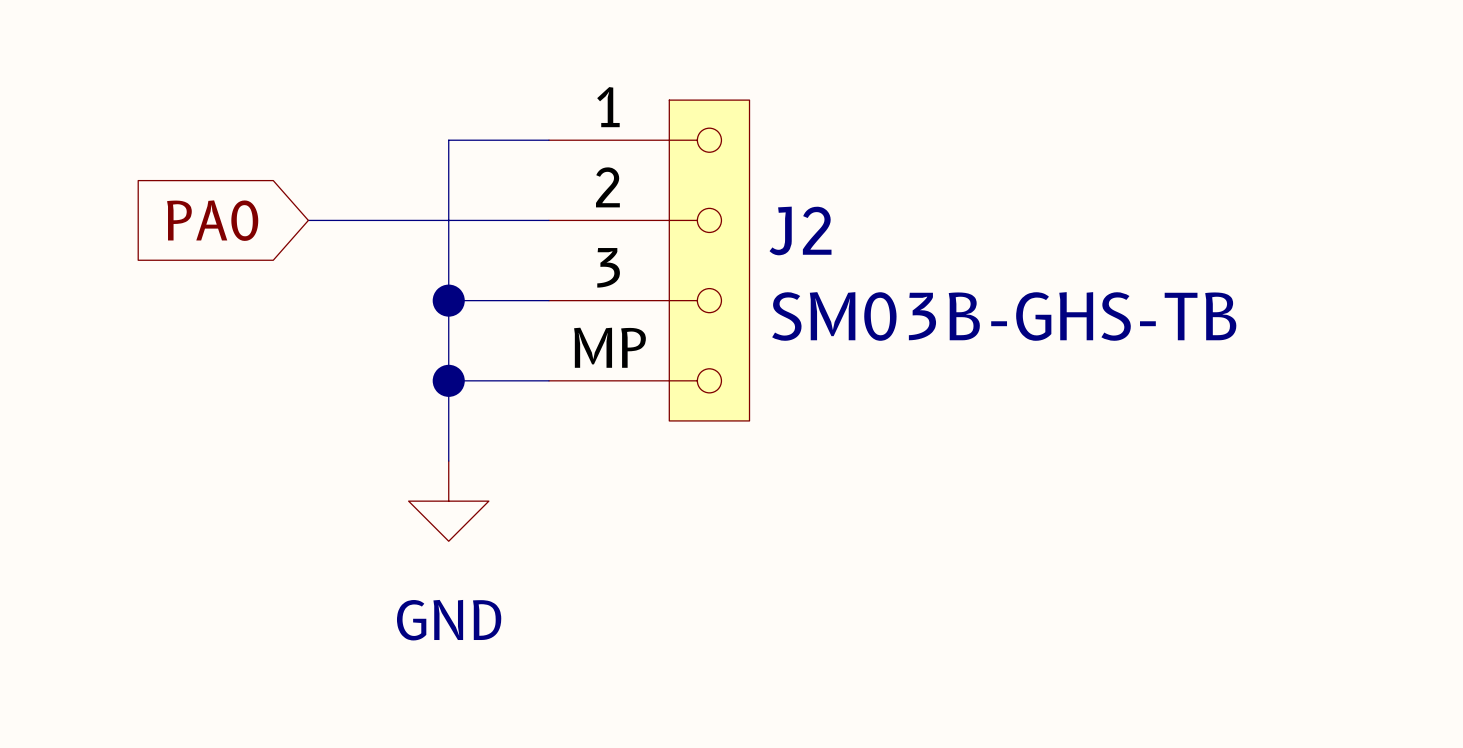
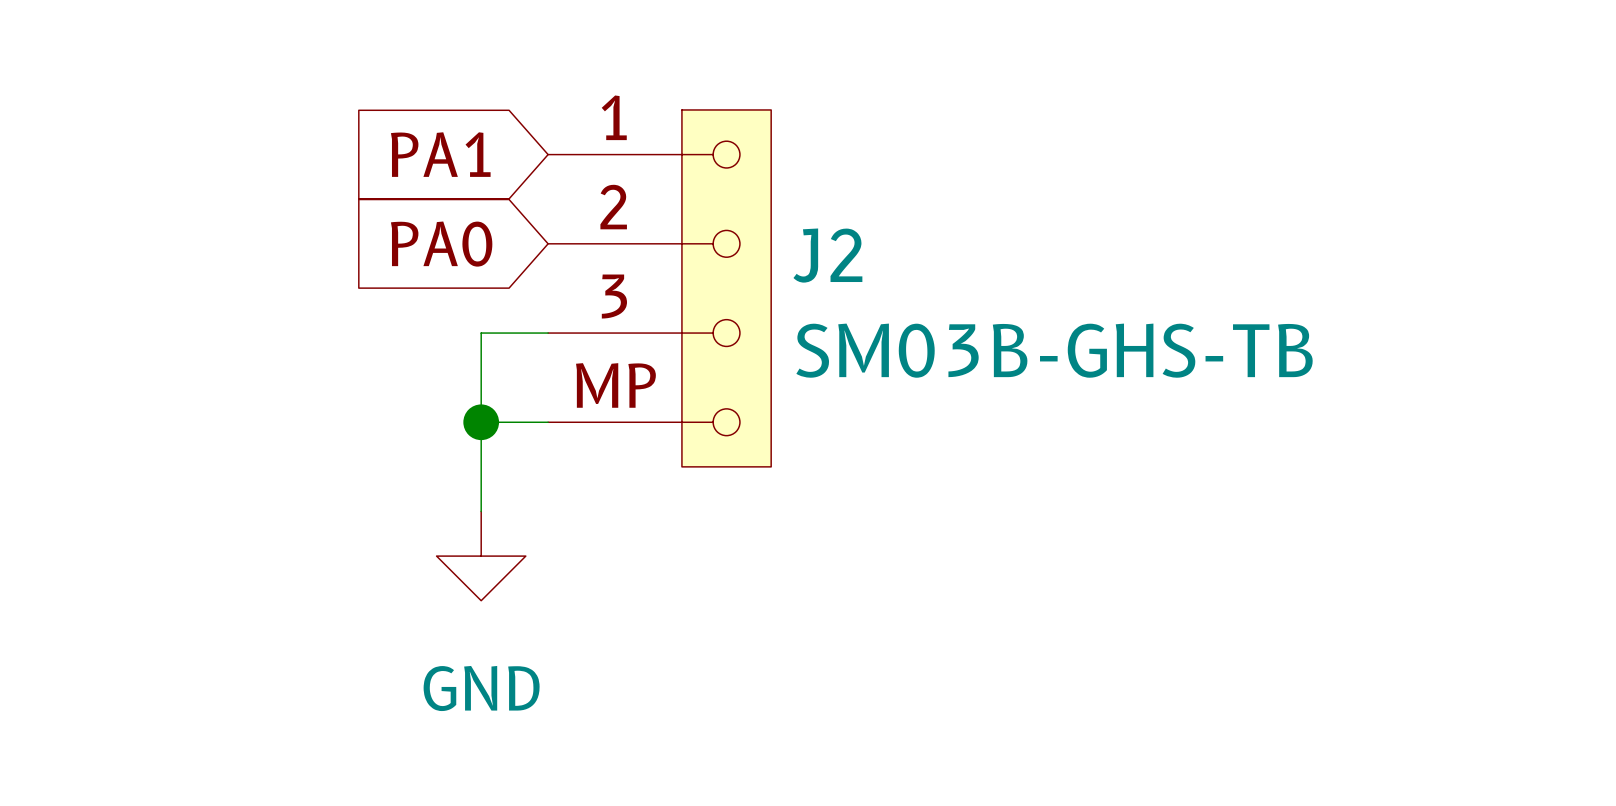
global label: none -> PA1 (440, 154)
wire: (548, 140) (448, 140) (448, 300) -> none
global label position: PA0 (212, 220) -> PA0 (441, 244)
wire: (308, 220) (548, 220) -> none
J2 position: (649, 260) -> (659, 288)
junction: (448, 300) -> none

